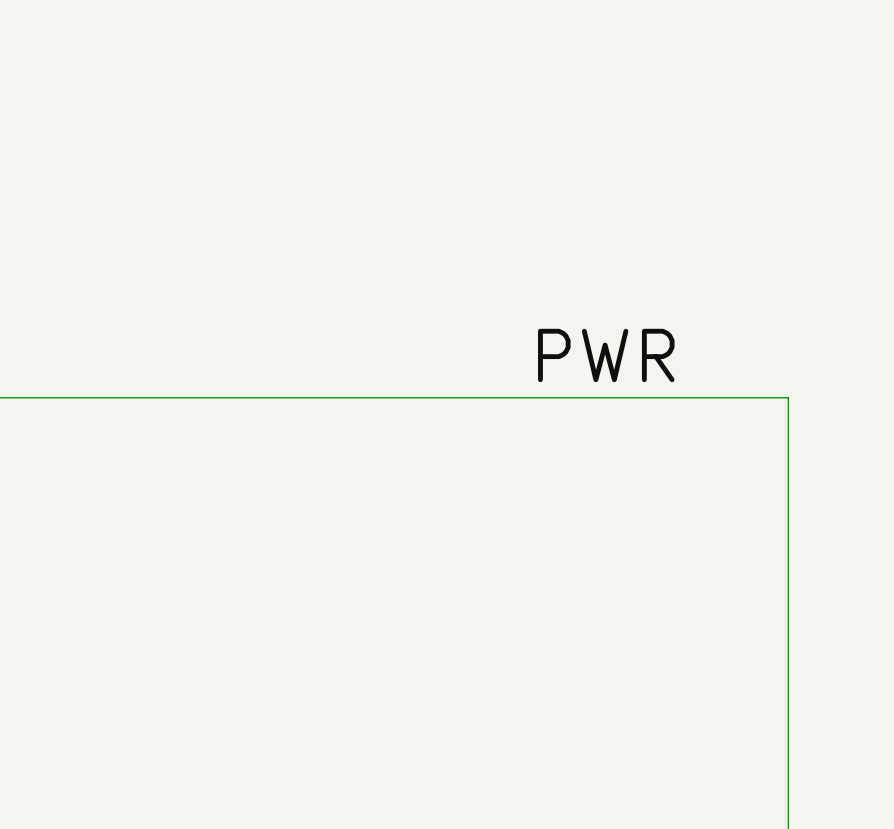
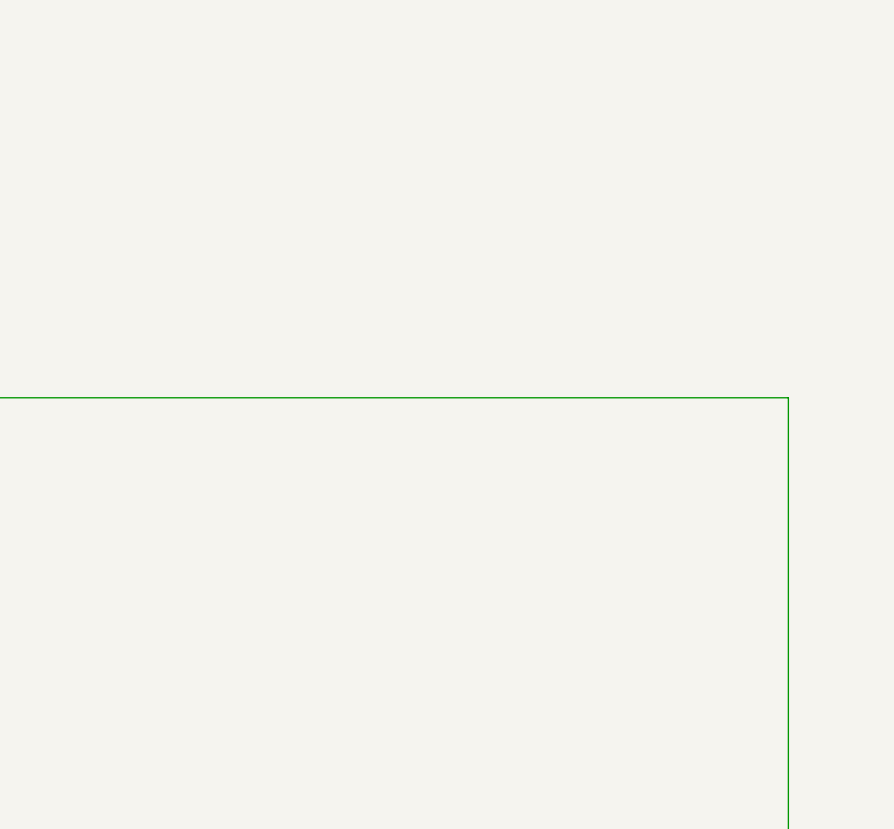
label: PWR (606, 355) -> none

